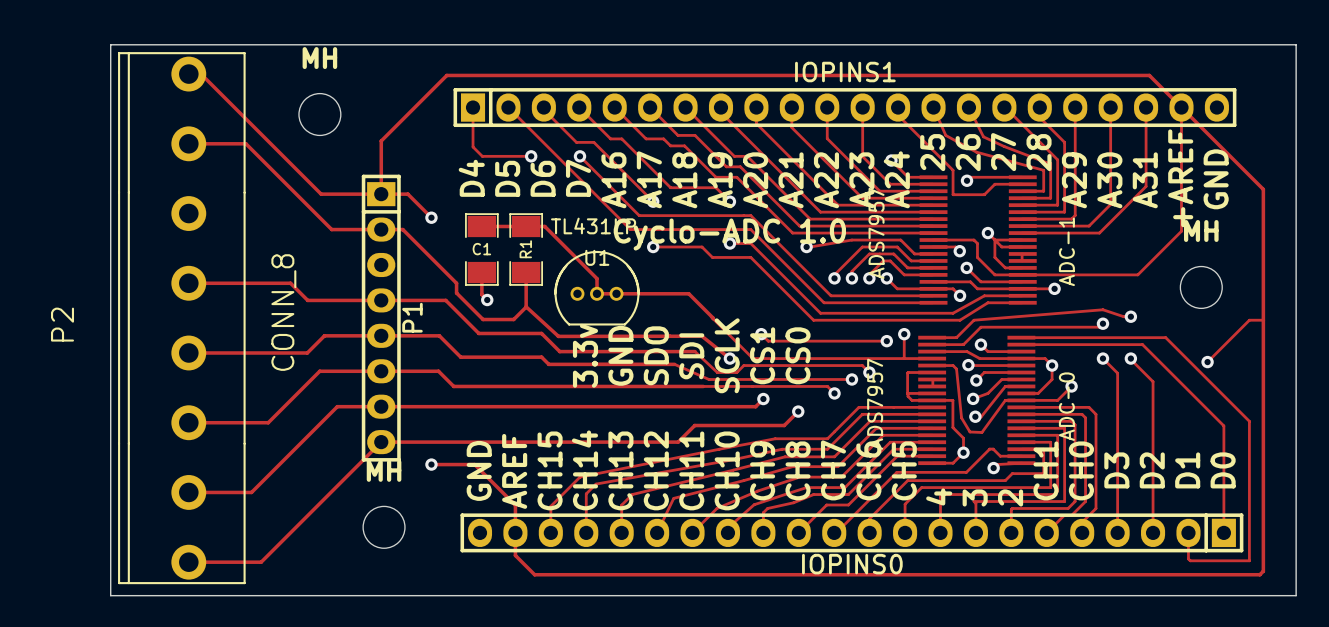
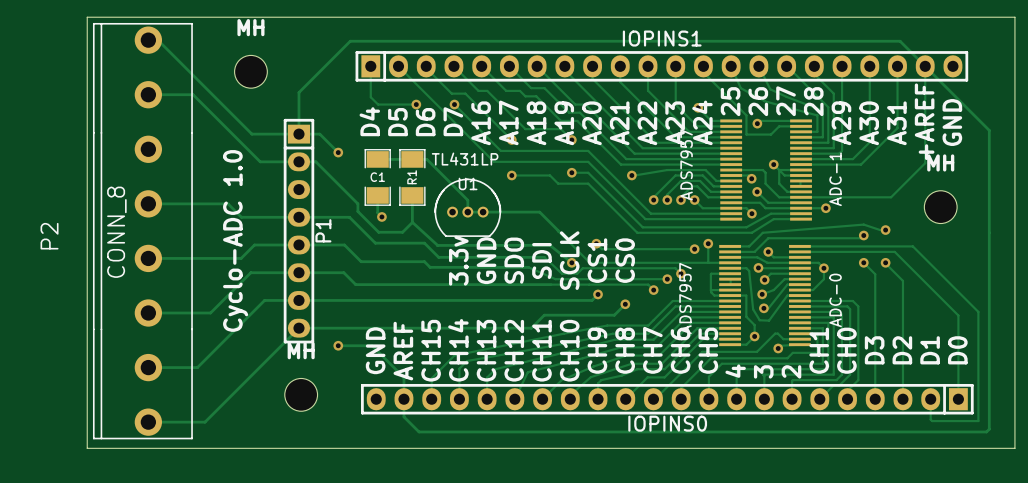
text: Cyclo-ADC 1.0 (729, 234) -> none
P2 value position: CONN_8 (283, 312) -> CONN_8 (116, 232)
track: (1263, 320) (1249, 320) (1207, 362) -> none
text: none -> Cyclo-ADC 1.0 (235, 240)
via: (1207, 362) -> none
track: (1071, 386) (1057, 400) (1021, 400) -> none
via: (1071, 386) -> none

